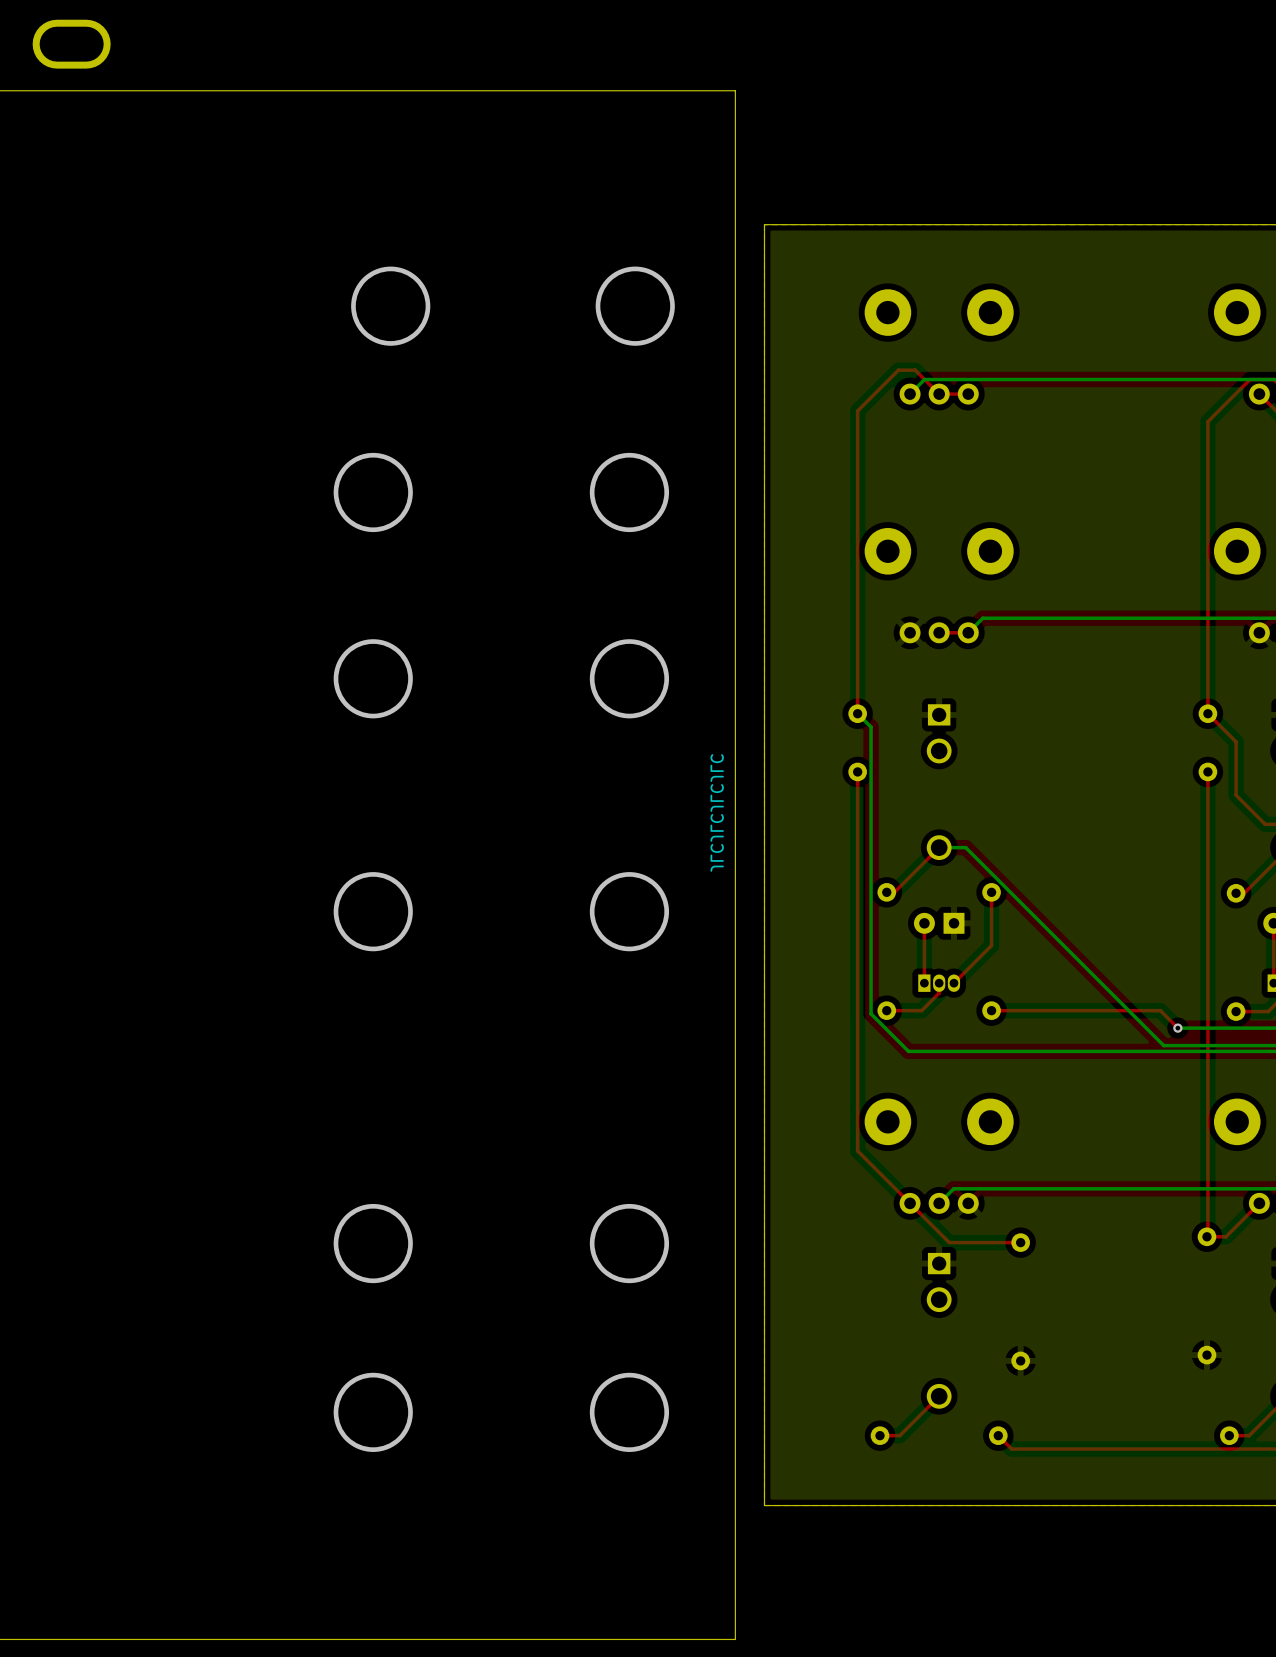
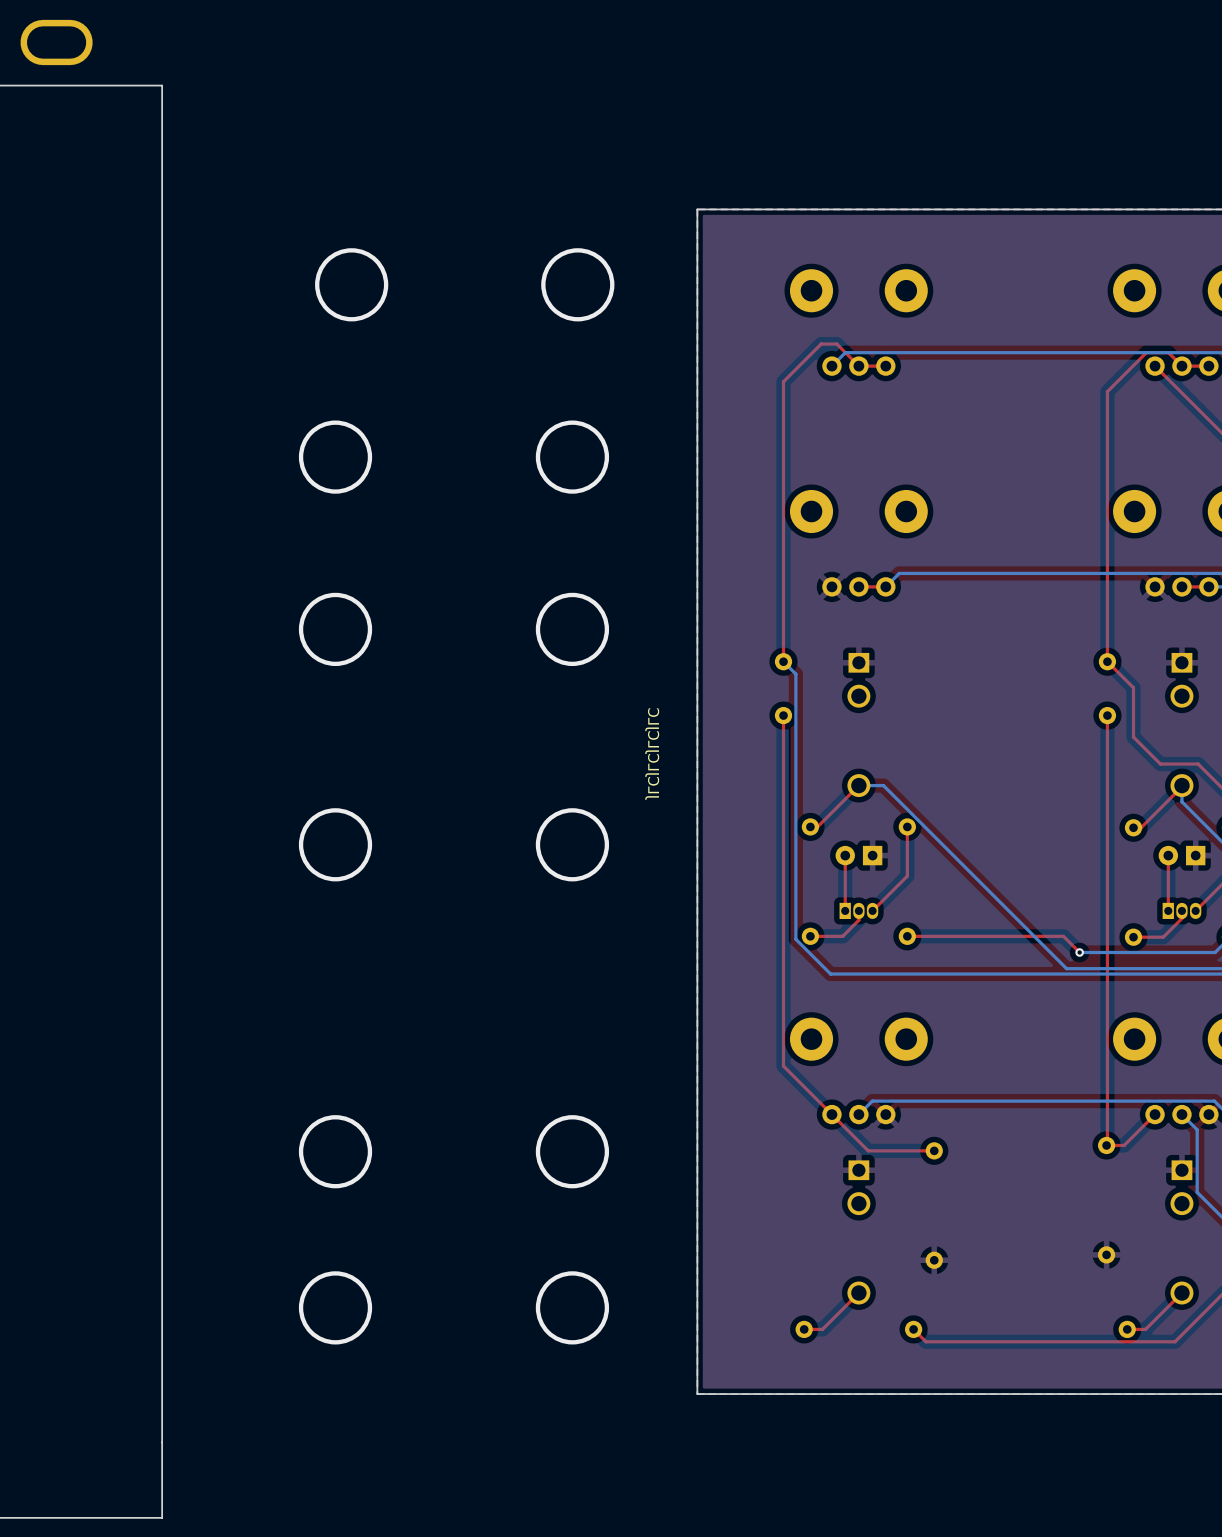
board edge: (185, 90) (735, 90) (735, 1639) (185, 1639) -> (162, 85) (162, 1517)

